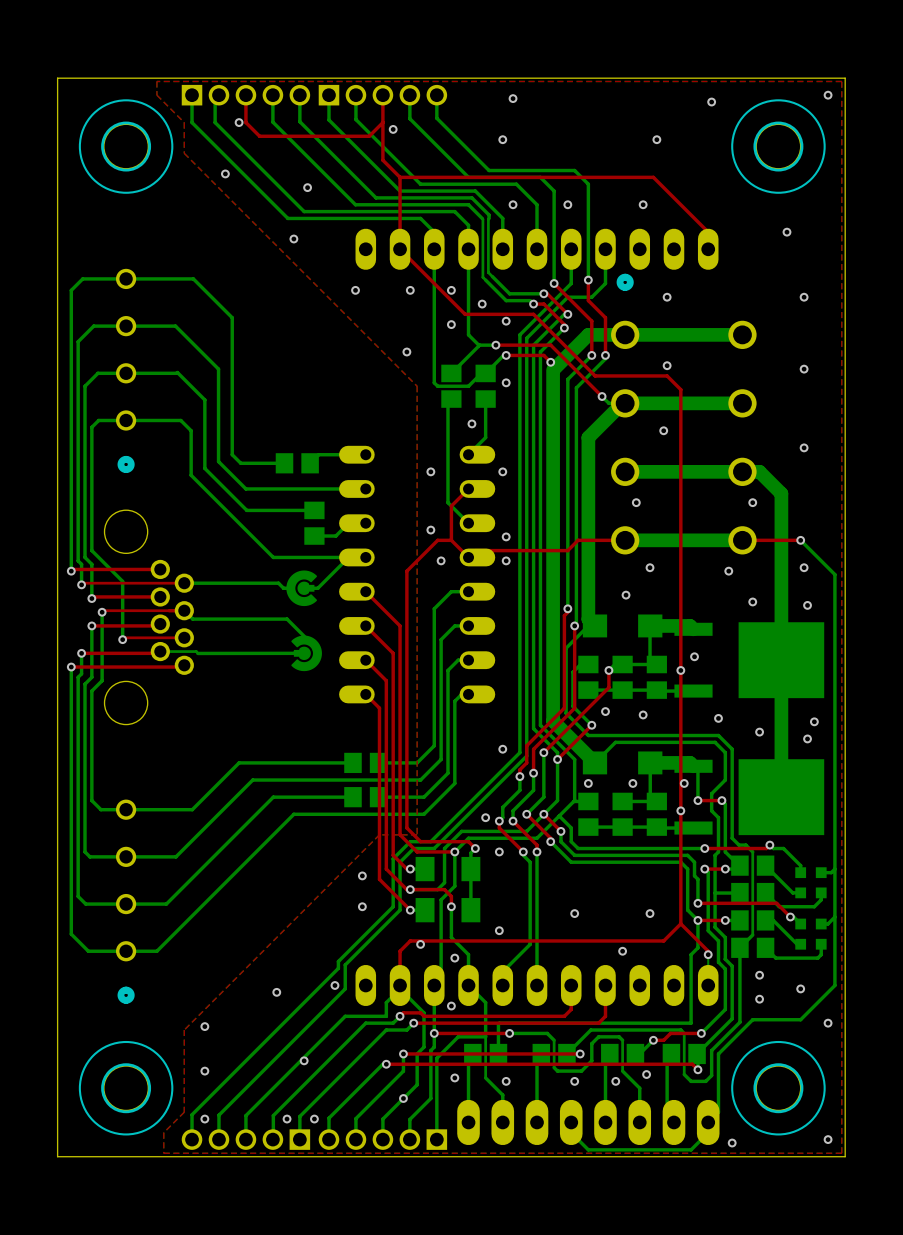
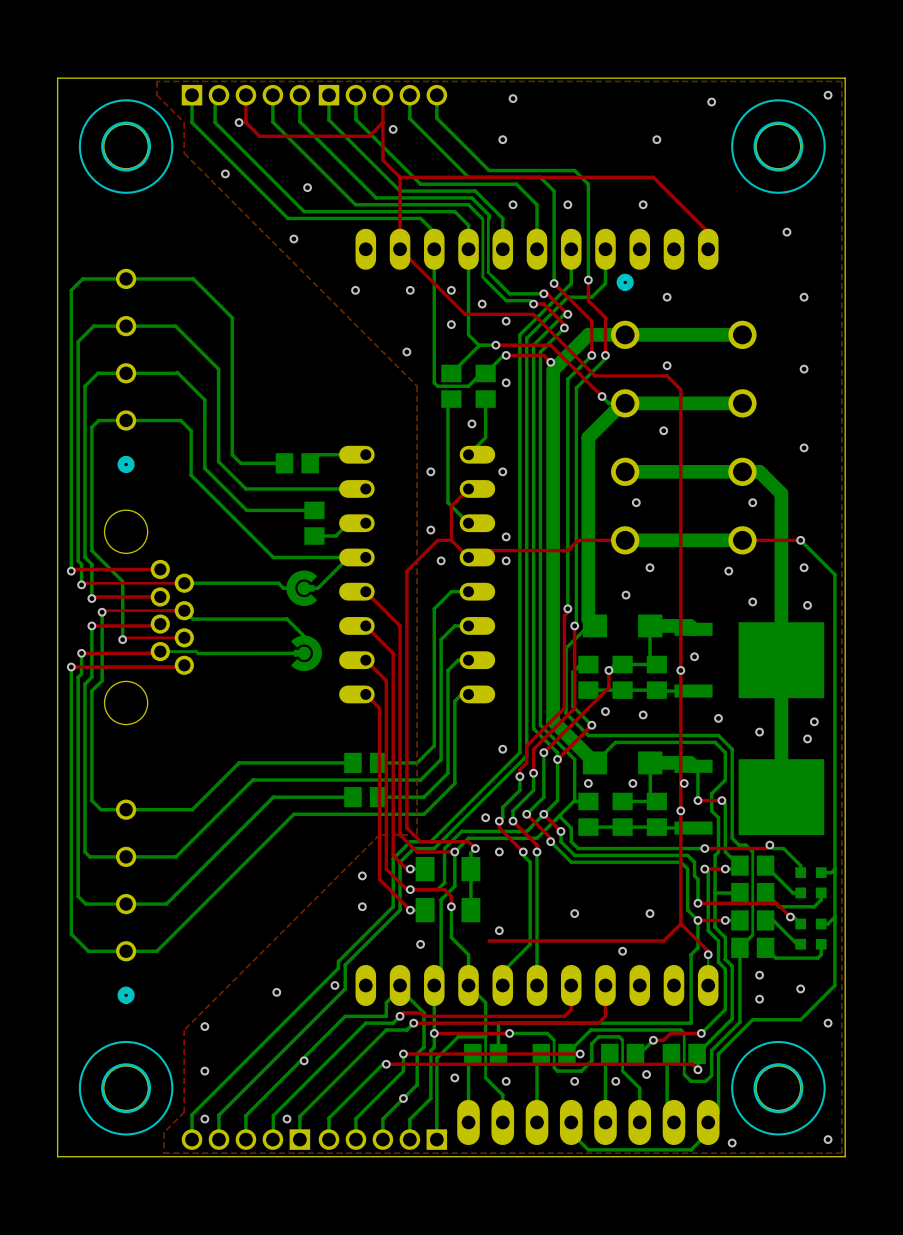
top track: (489, 940) (410, 940) (400, 951) (400, 985) -> none
via: (454, 958) -> none
via: (451, 1006) -> none
via: (314, 1119) -> none

